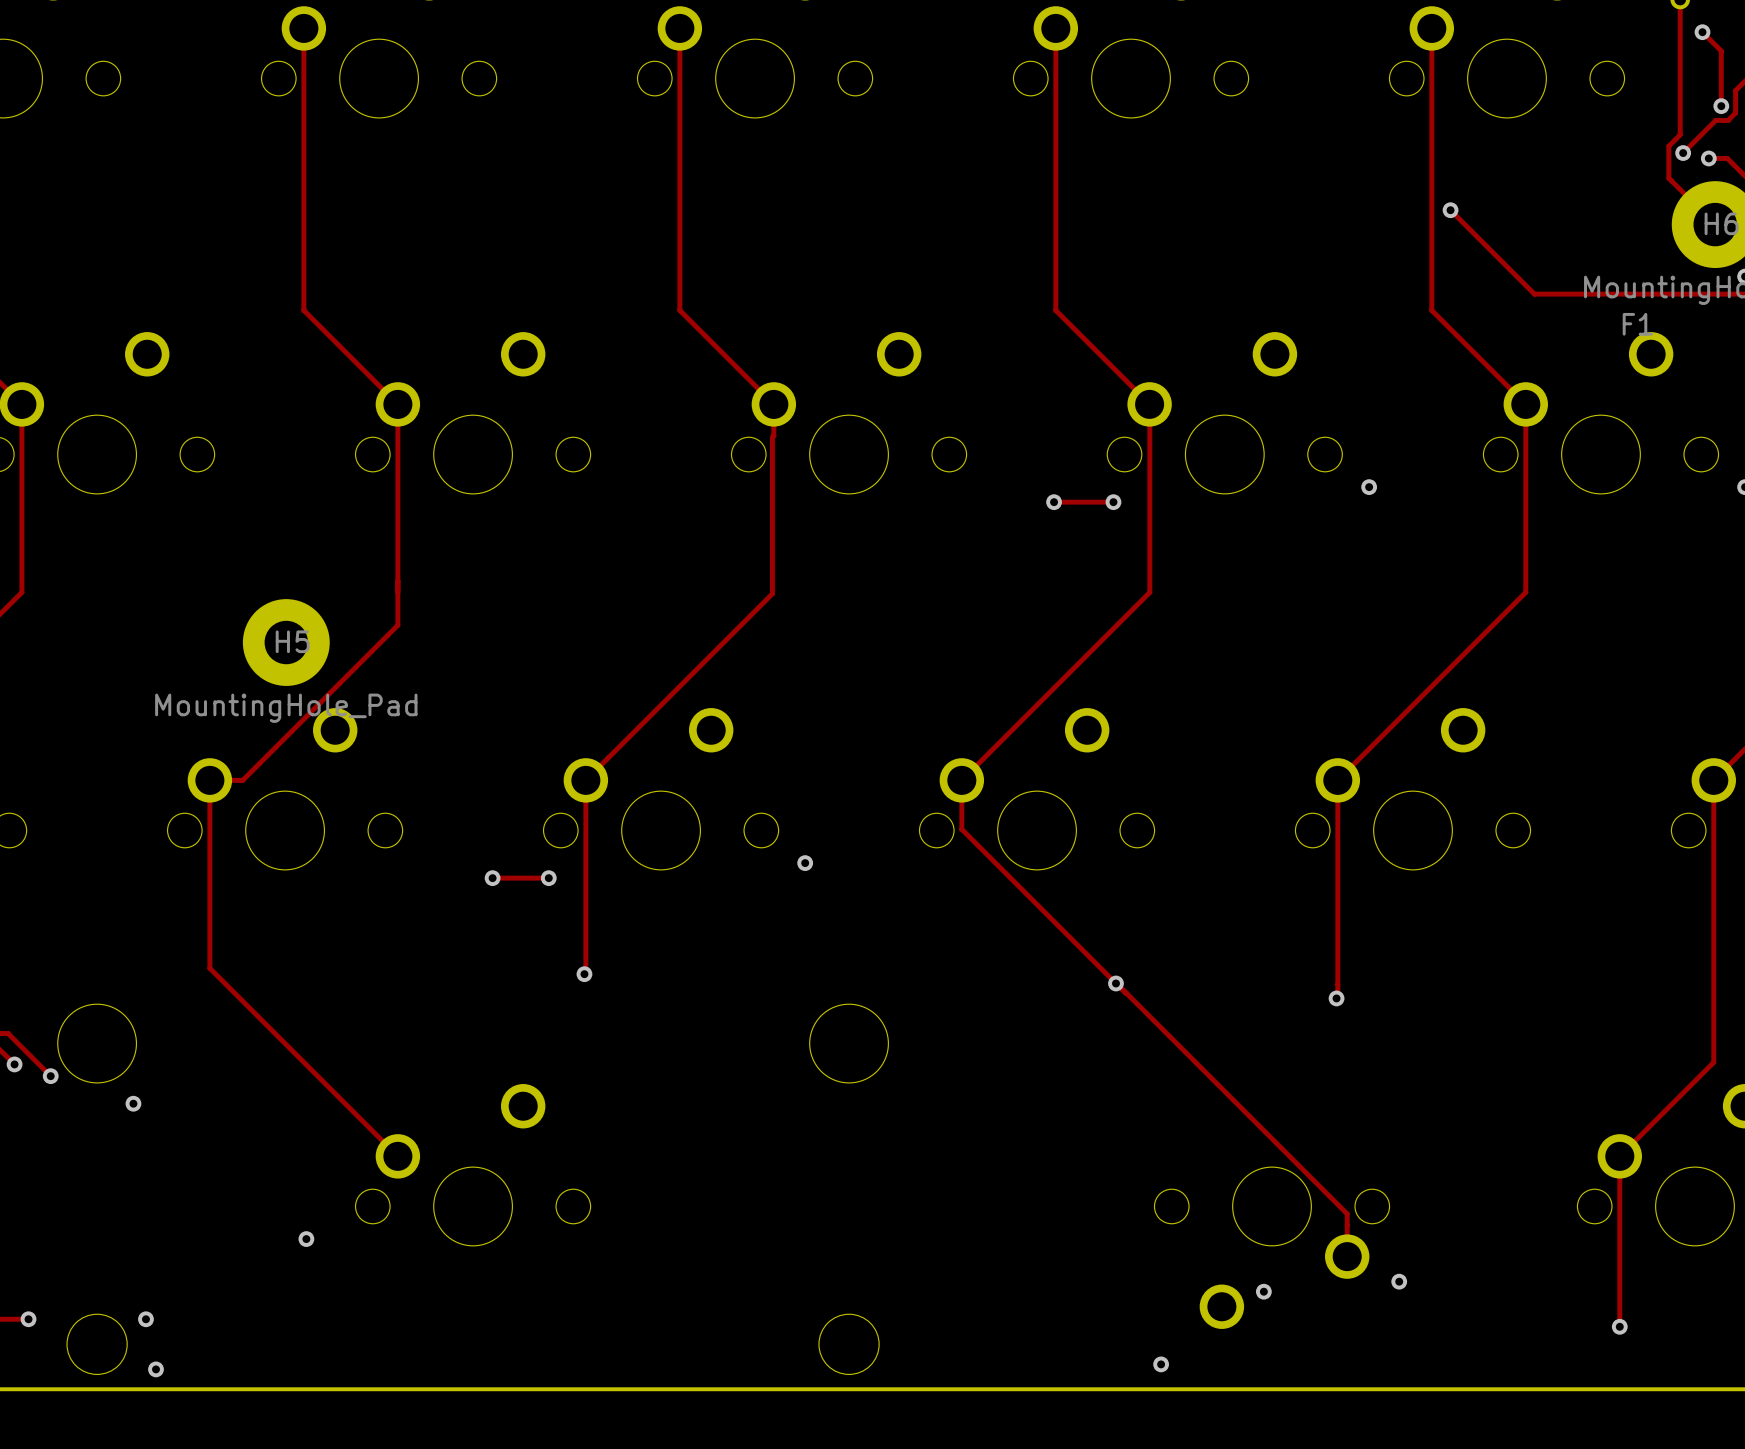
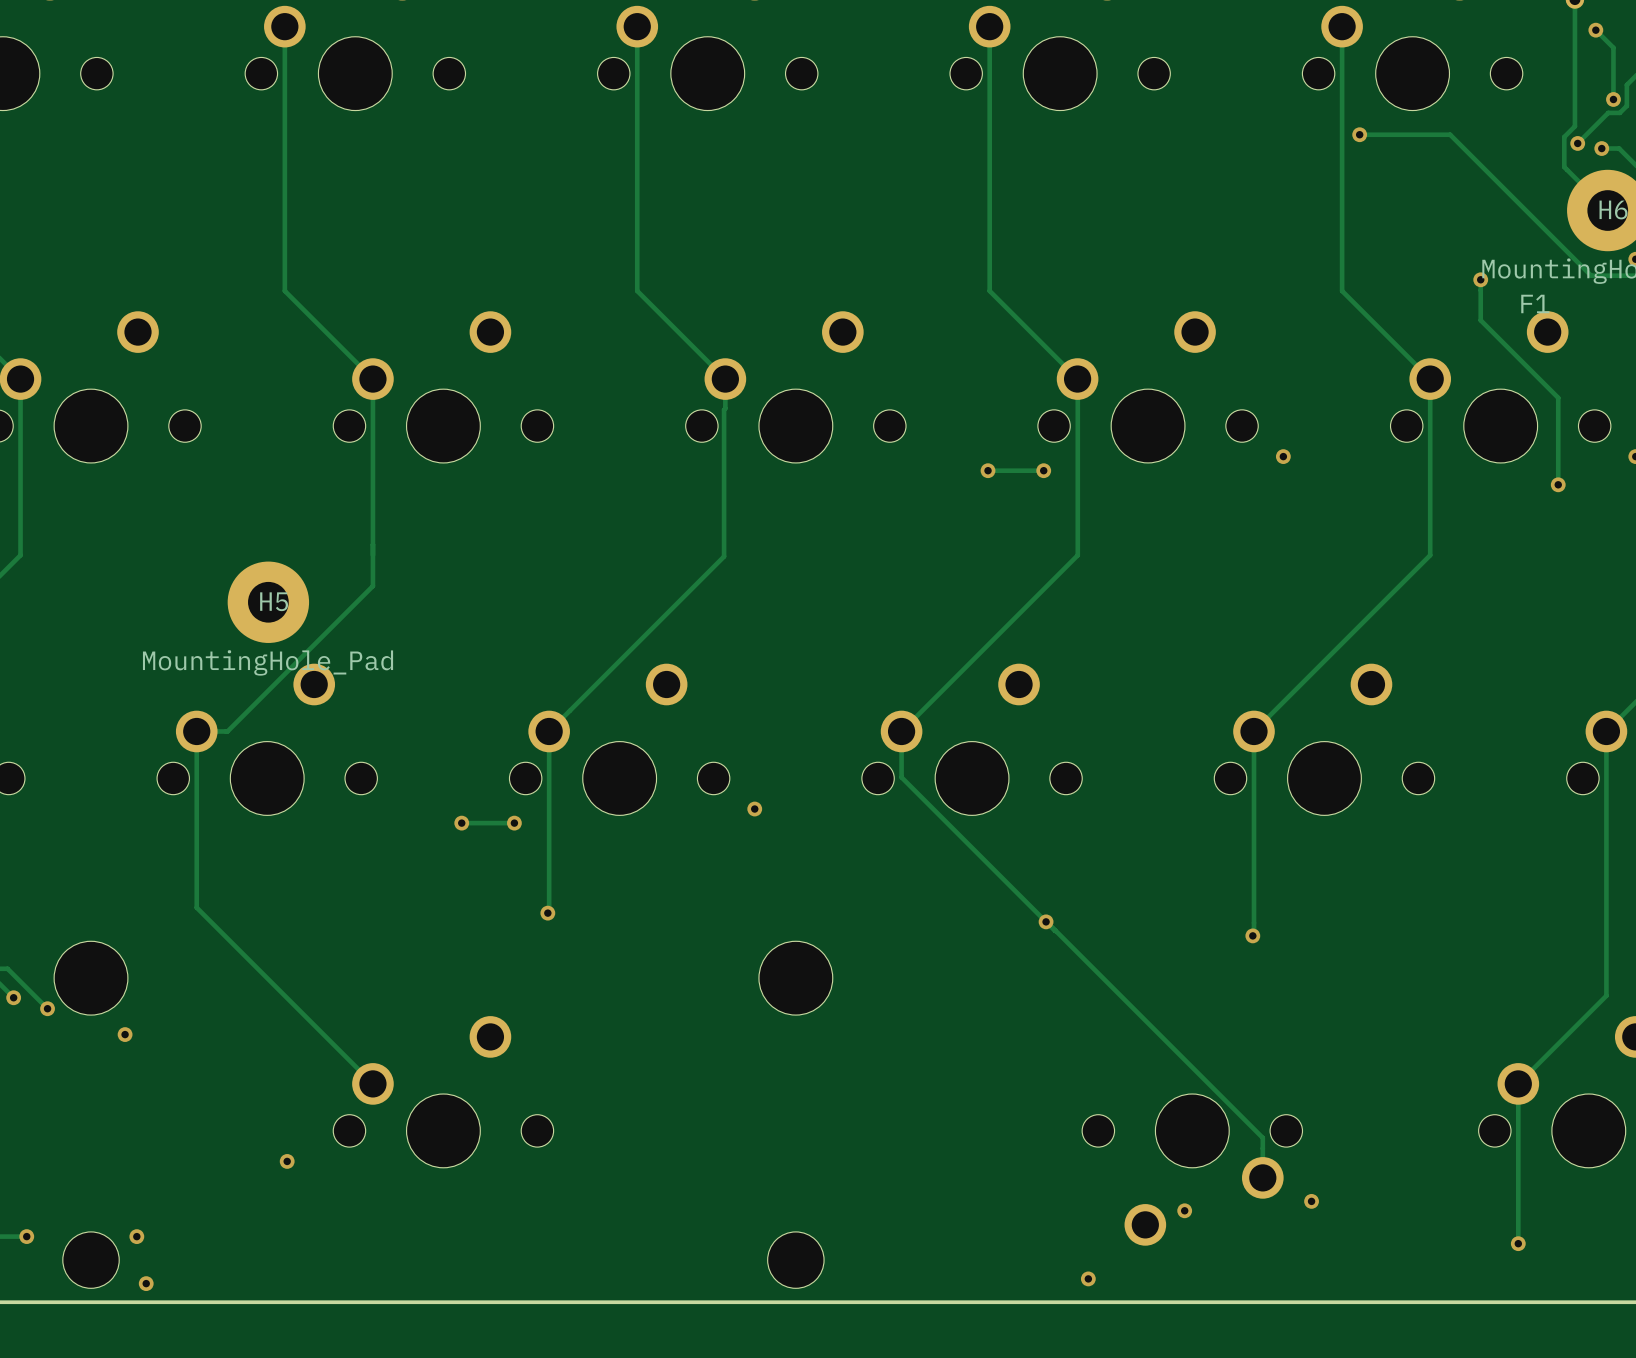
track: (1450, 210) (1534, 294) (1697, 294) -> (1359, 134) (1450, 134) (1591, 275)
via position: (1450, 210) -> (1359, 134)
track: none -> (1480, 279) (1480, 320) (1558, 397) (1558, 484)
via: none -> (1480, 279)
via: none -> (1558, 484)

